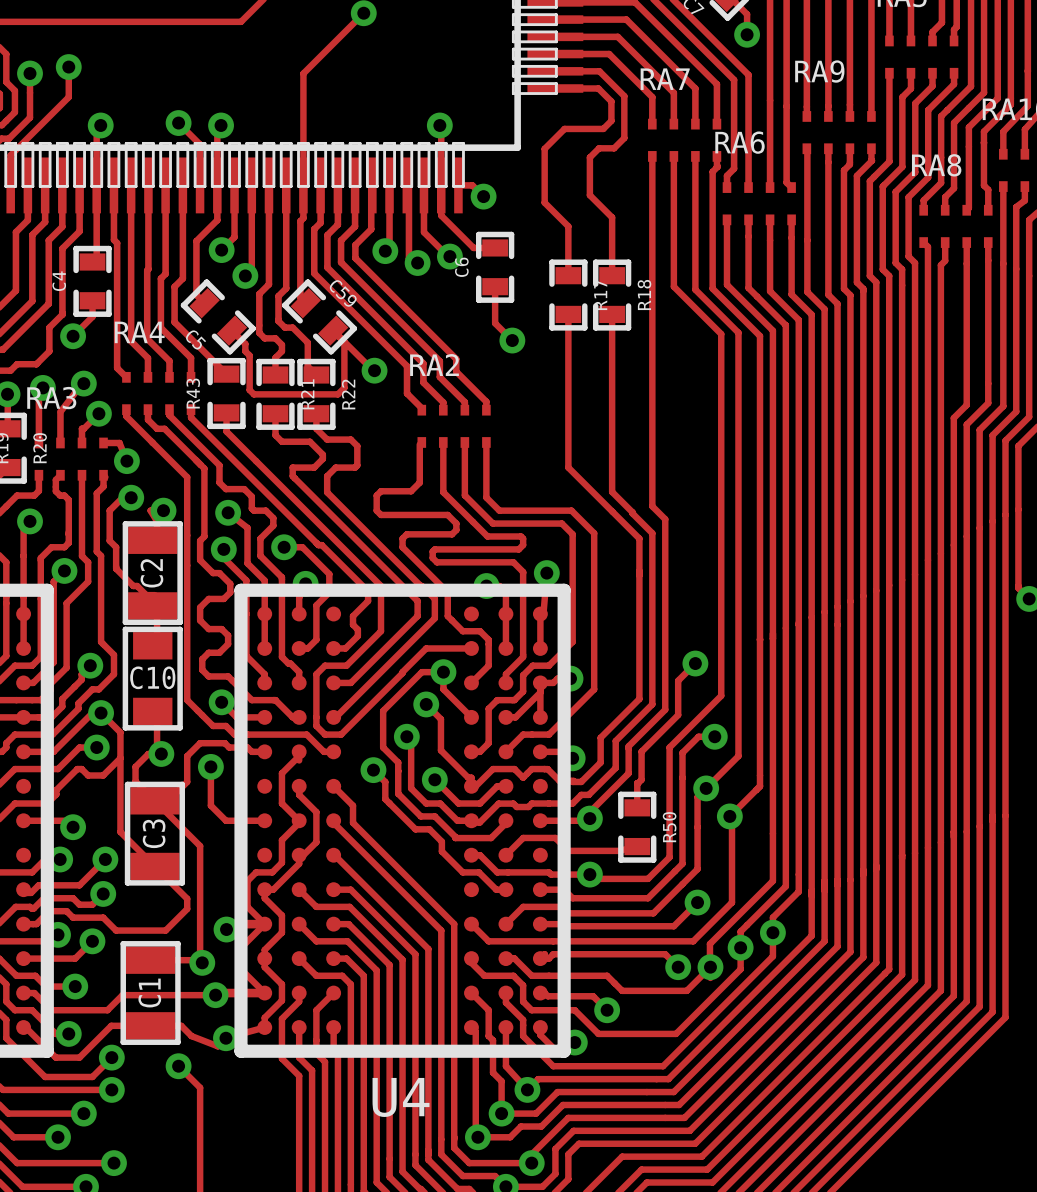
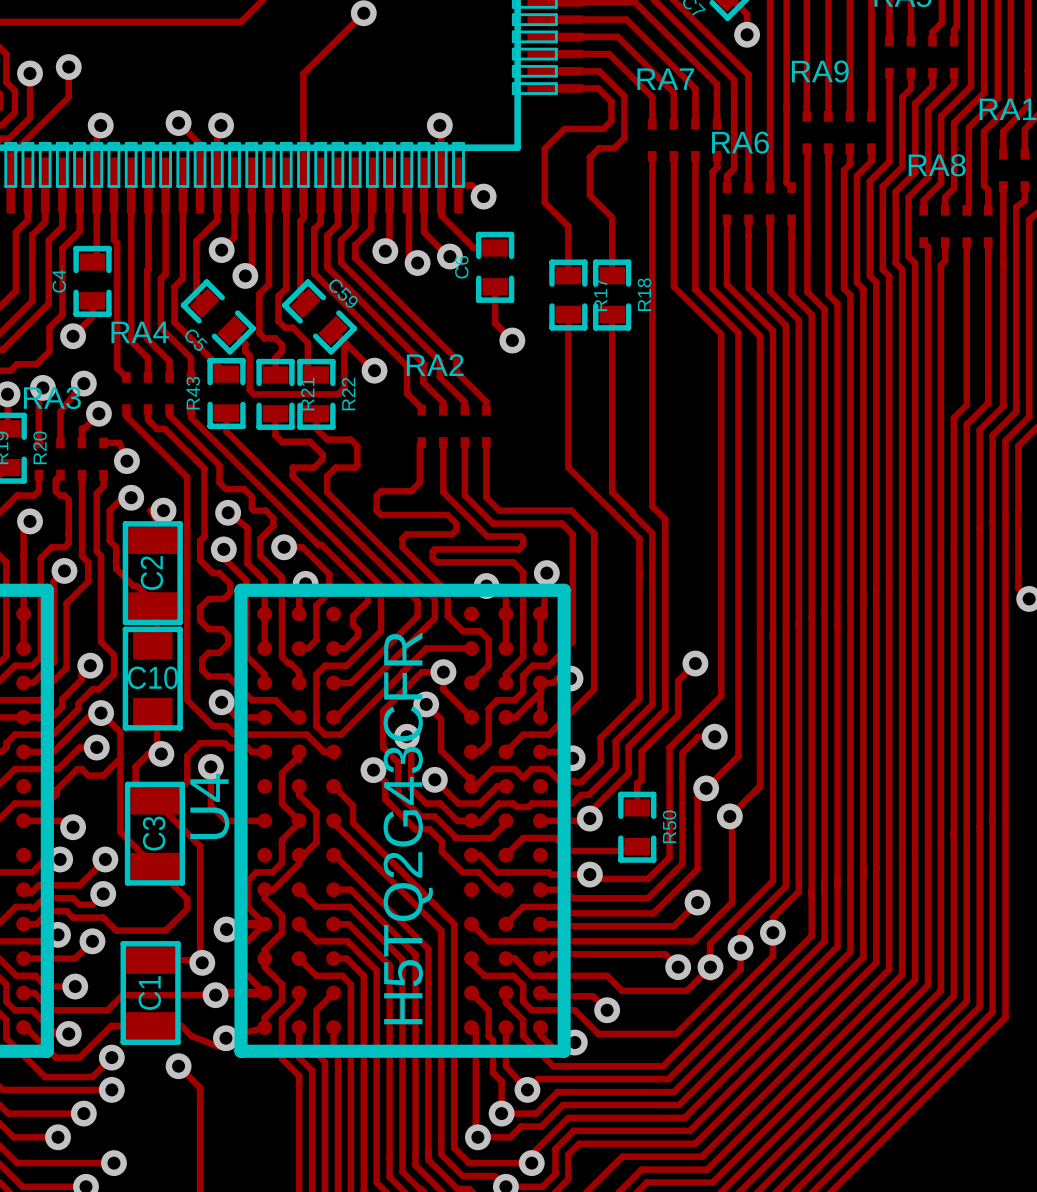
U4 value: none -> H5TQ2G43CFR (408, 828)
U4 name rotation: 0° (401, 1097) -> 90° counterclockwise (209, 806)
U4 name position: U4 (401, 1097) -> U4 (209, 806)

